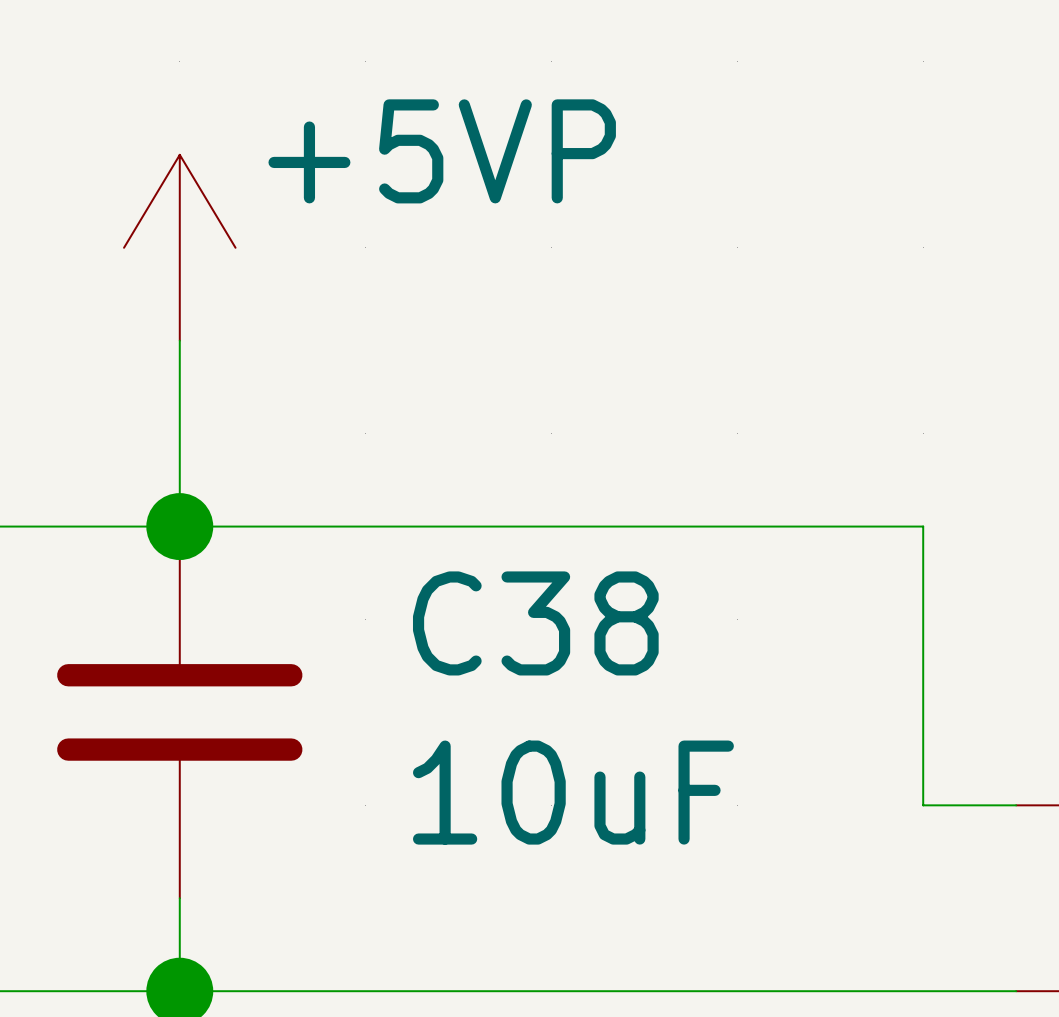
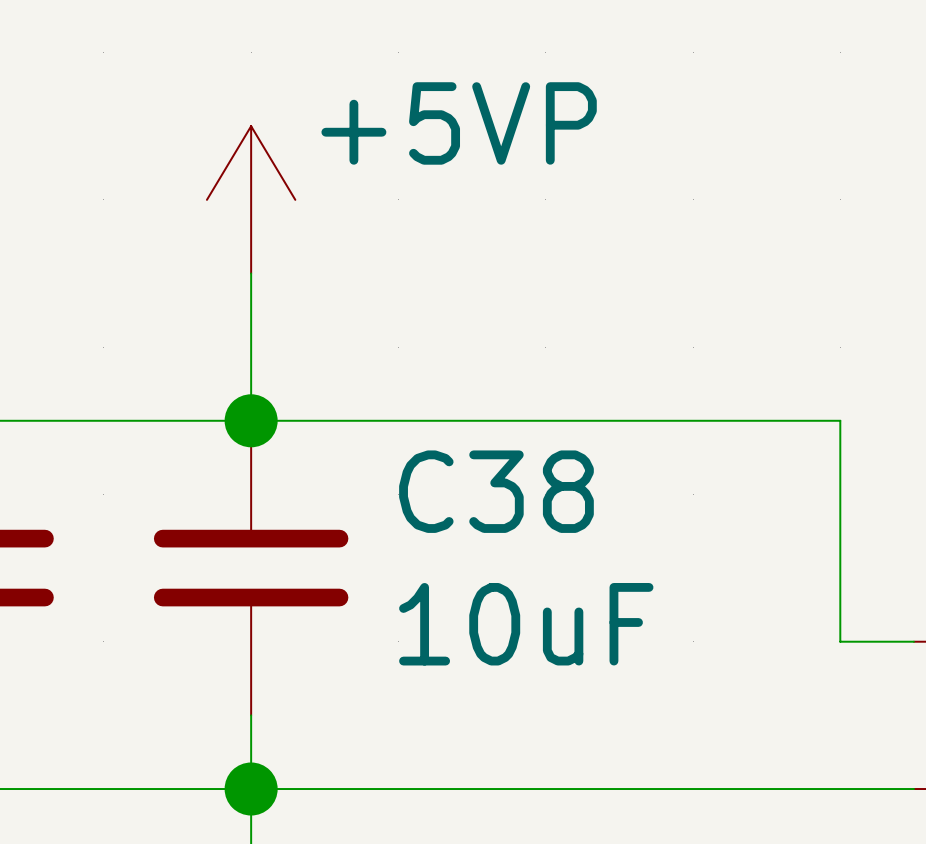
C38 name position: C38 (535, 623) -> C38 (496, 491)
C38 value position: 10uF (573, 792) -> 10uF (526, 624)

